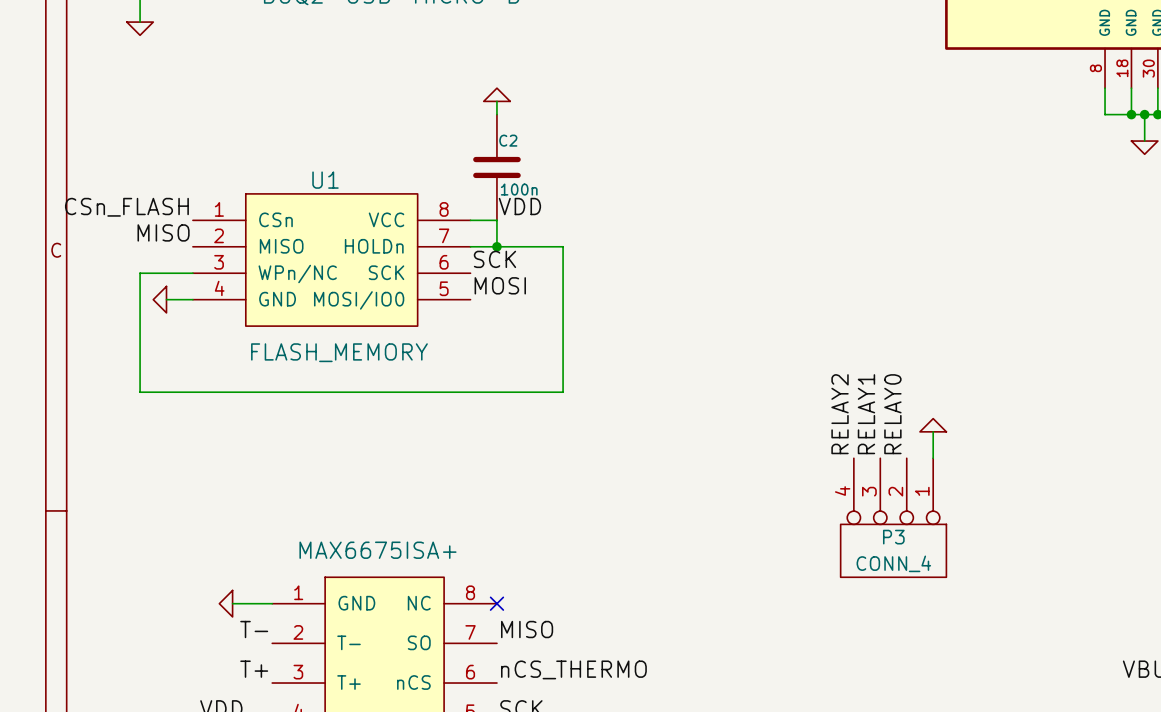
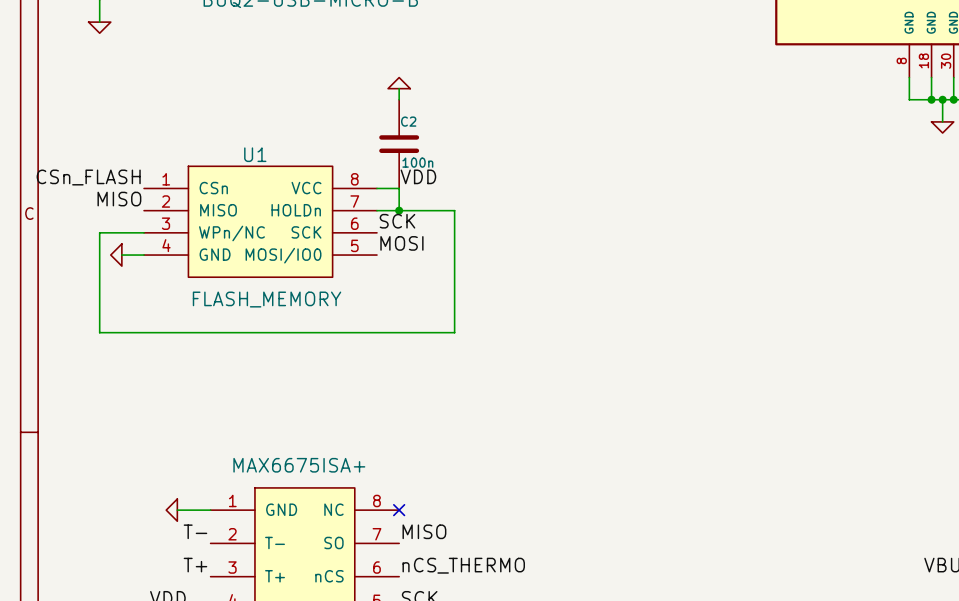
label: RELAY2 (840, 414) -> none
label: RELAY1 (866, 414) -> none
label: RELAY0 (892, 414) -> none
power symbol: (933, 425) -> none
wire: (933, 431) (933, 458) -> none
P3: CONN_4 (893, 517) -> none

